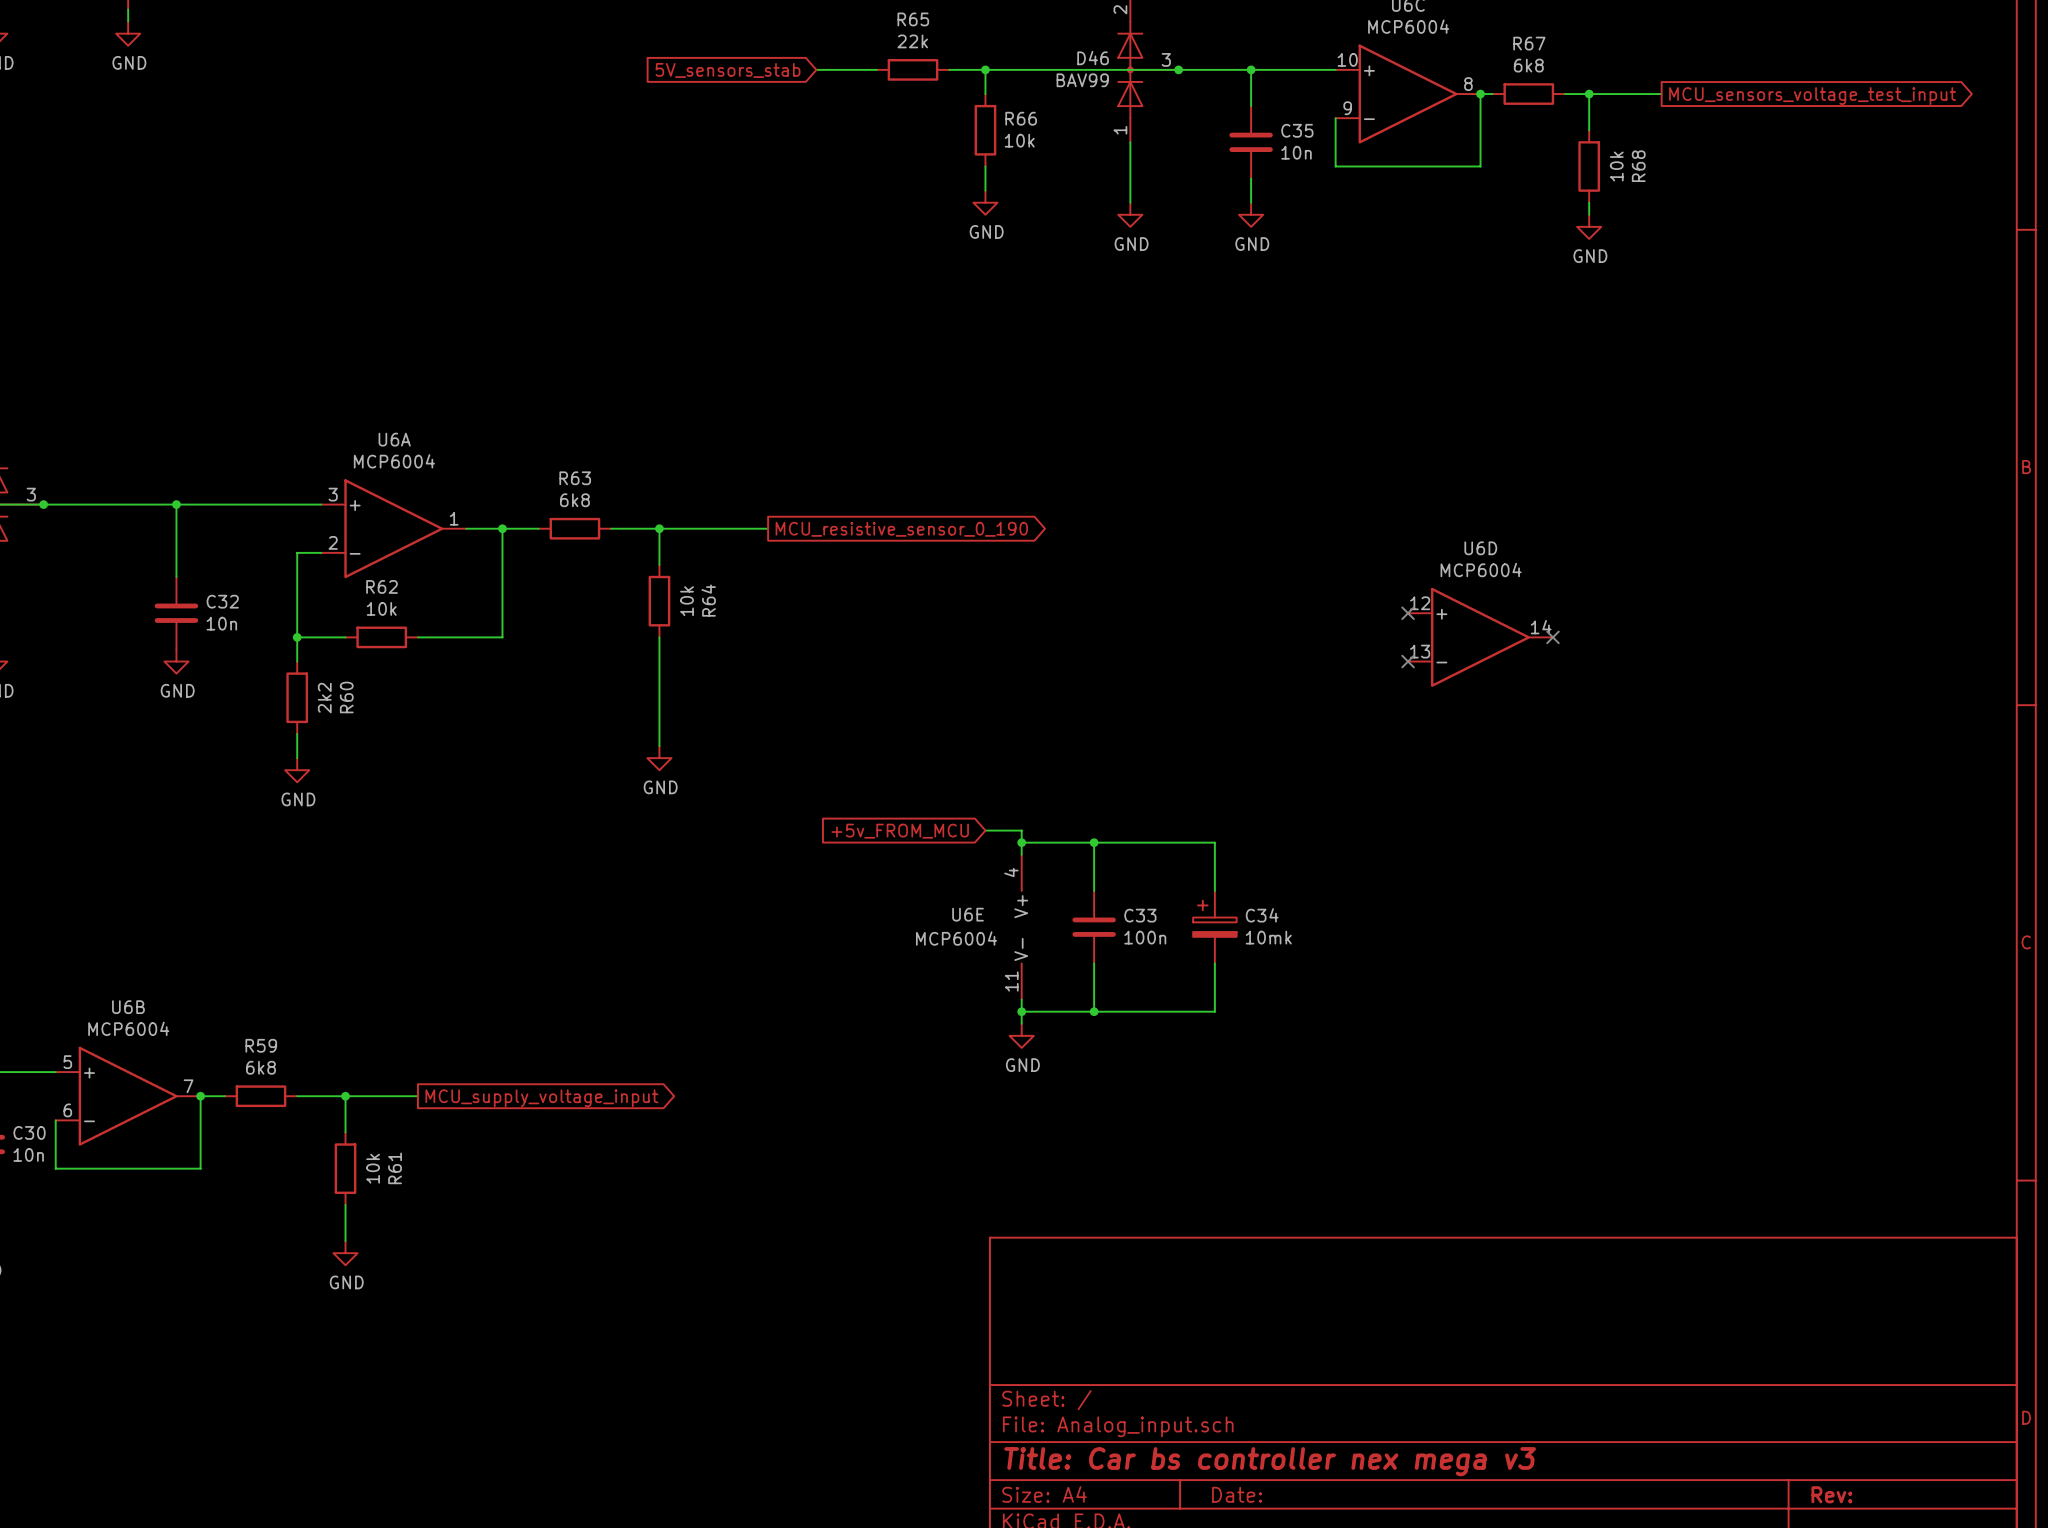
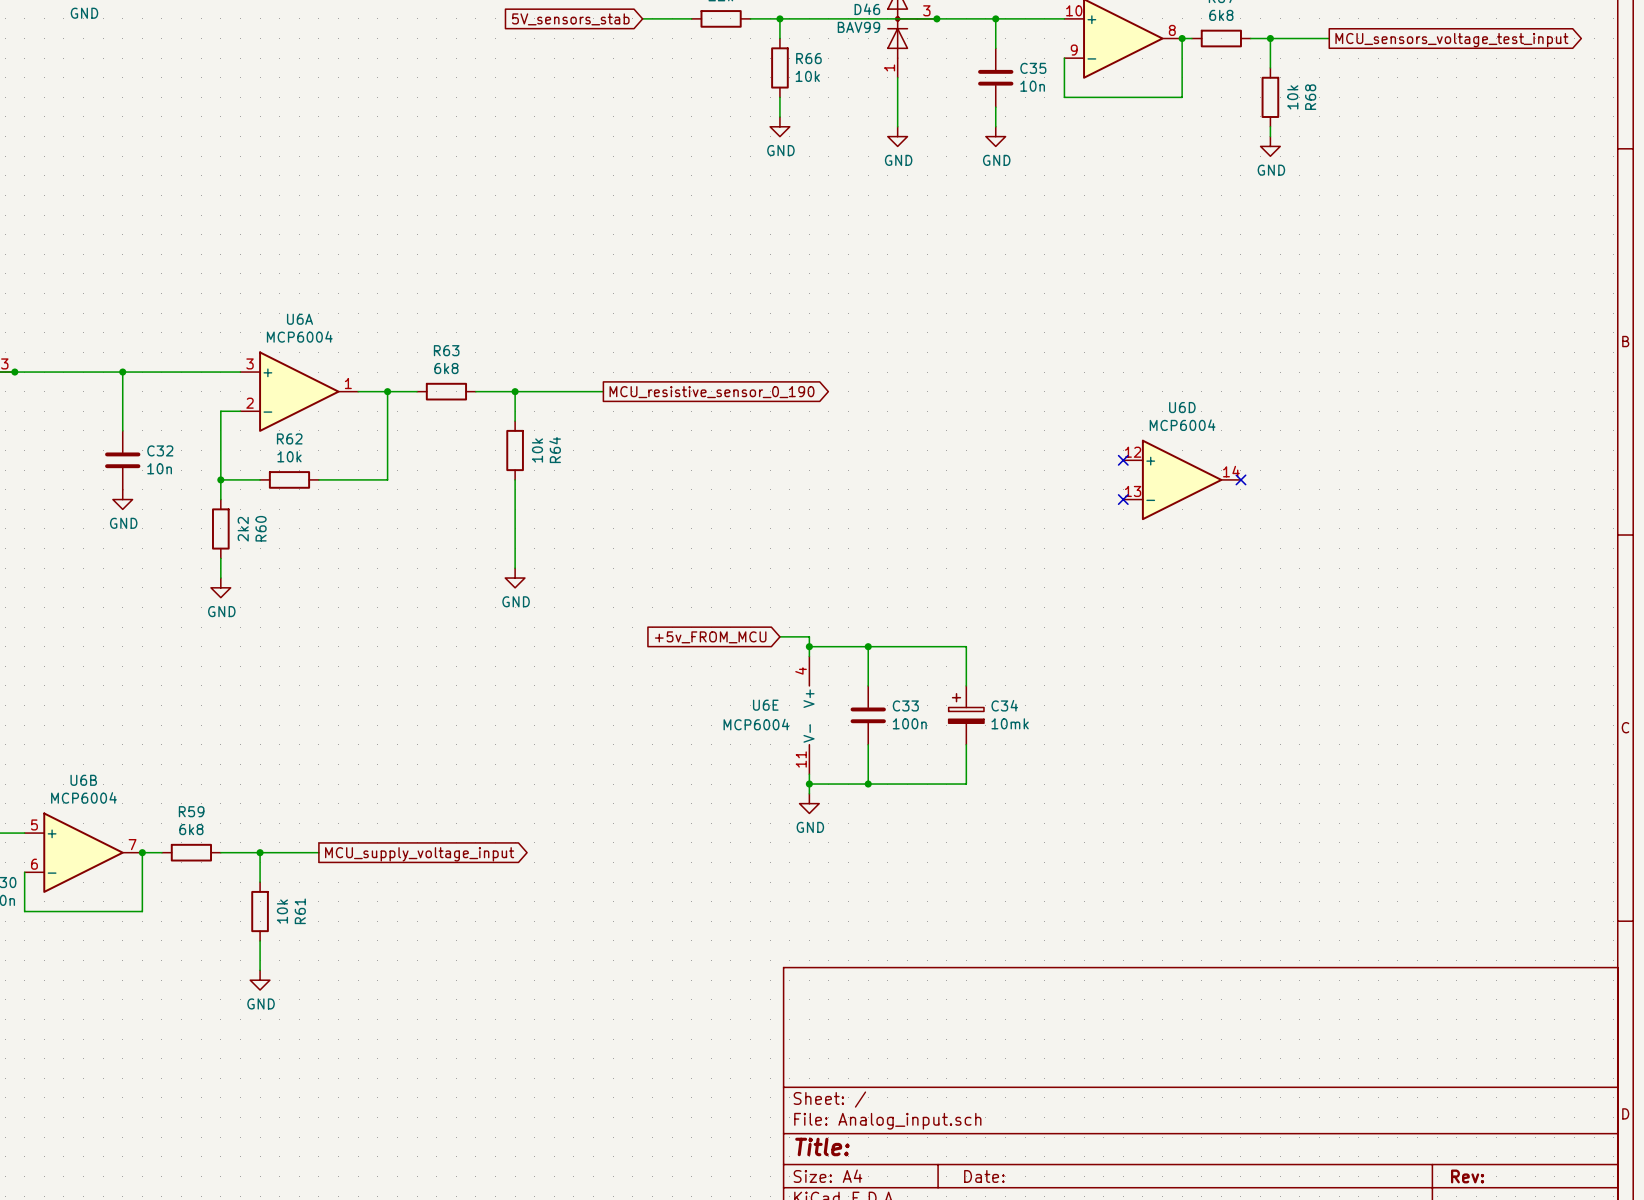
title block: Title: Car bs controller nex mega v3 (1270, 1461) -> Title: (822, 1146)

